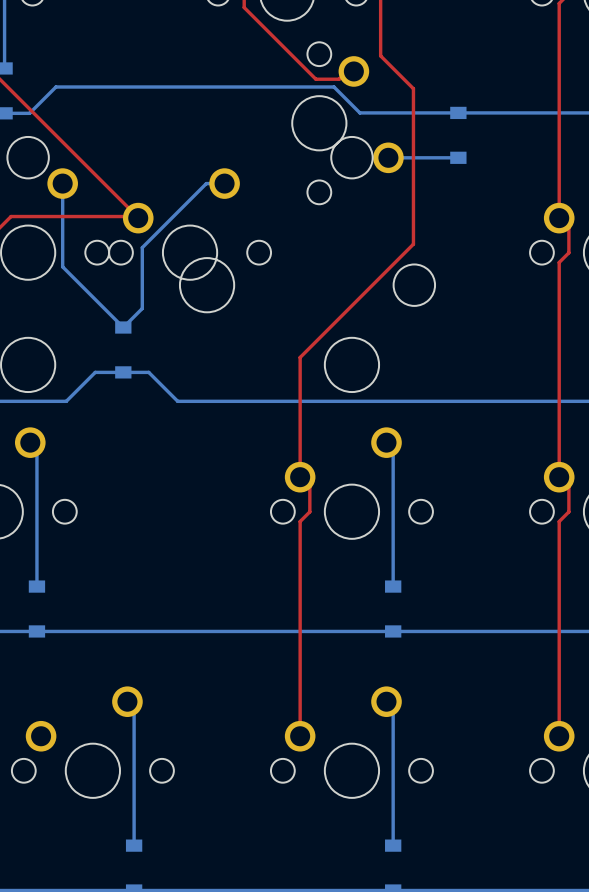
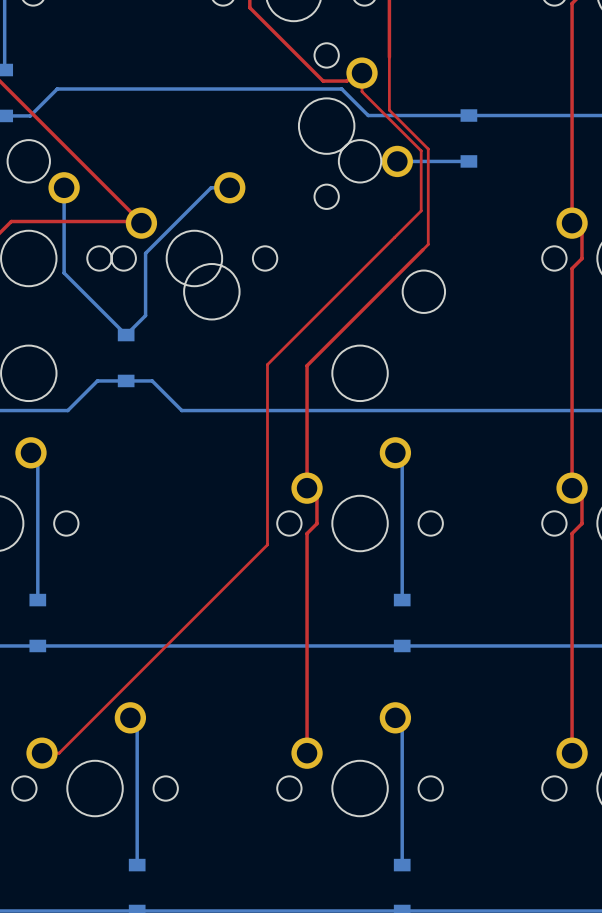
top track: (380, 55) (413, 88) (413, 244) -> (389, 57) (389, 110) (428, 149) (428, 244) (422, 249)
top track: none -> (362, 73) (362, 91) (421, 150) (421, 210) (267, 364) (267, 544) (59, 753) (42, 753)

